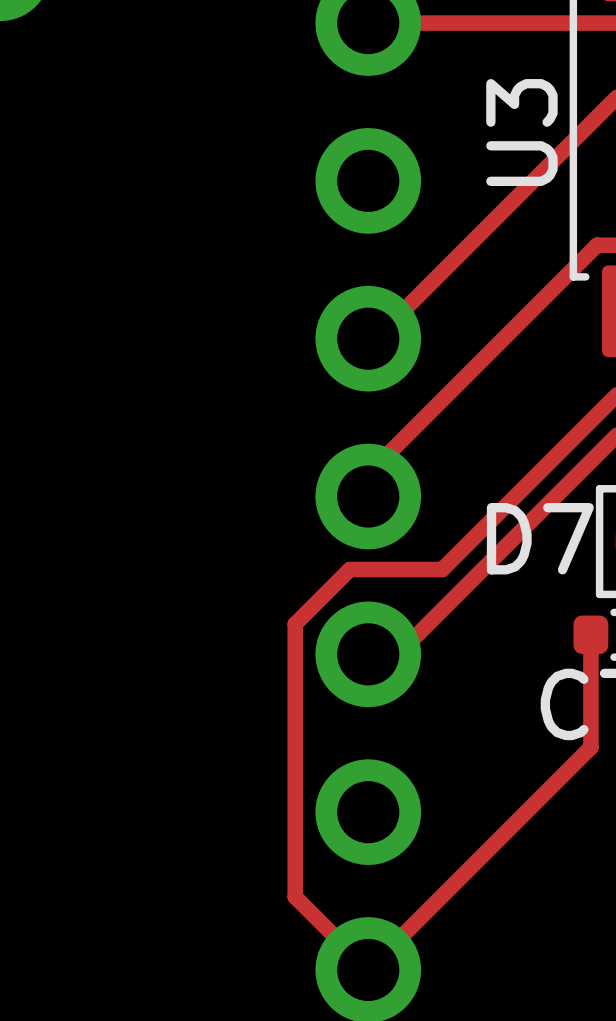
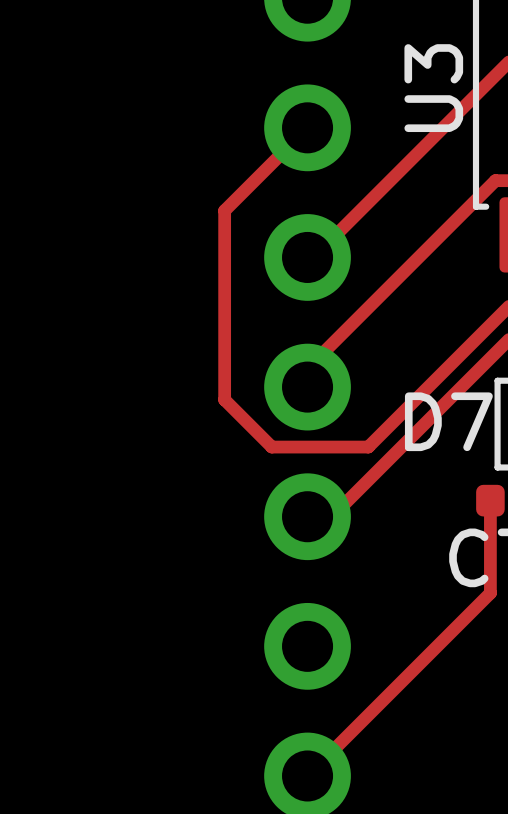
track: (349, 569) (295, 624) (295, 896) (368, 969) -> (292, 447) (271, 447) (224, 399) (224, 210) (307, 127)

